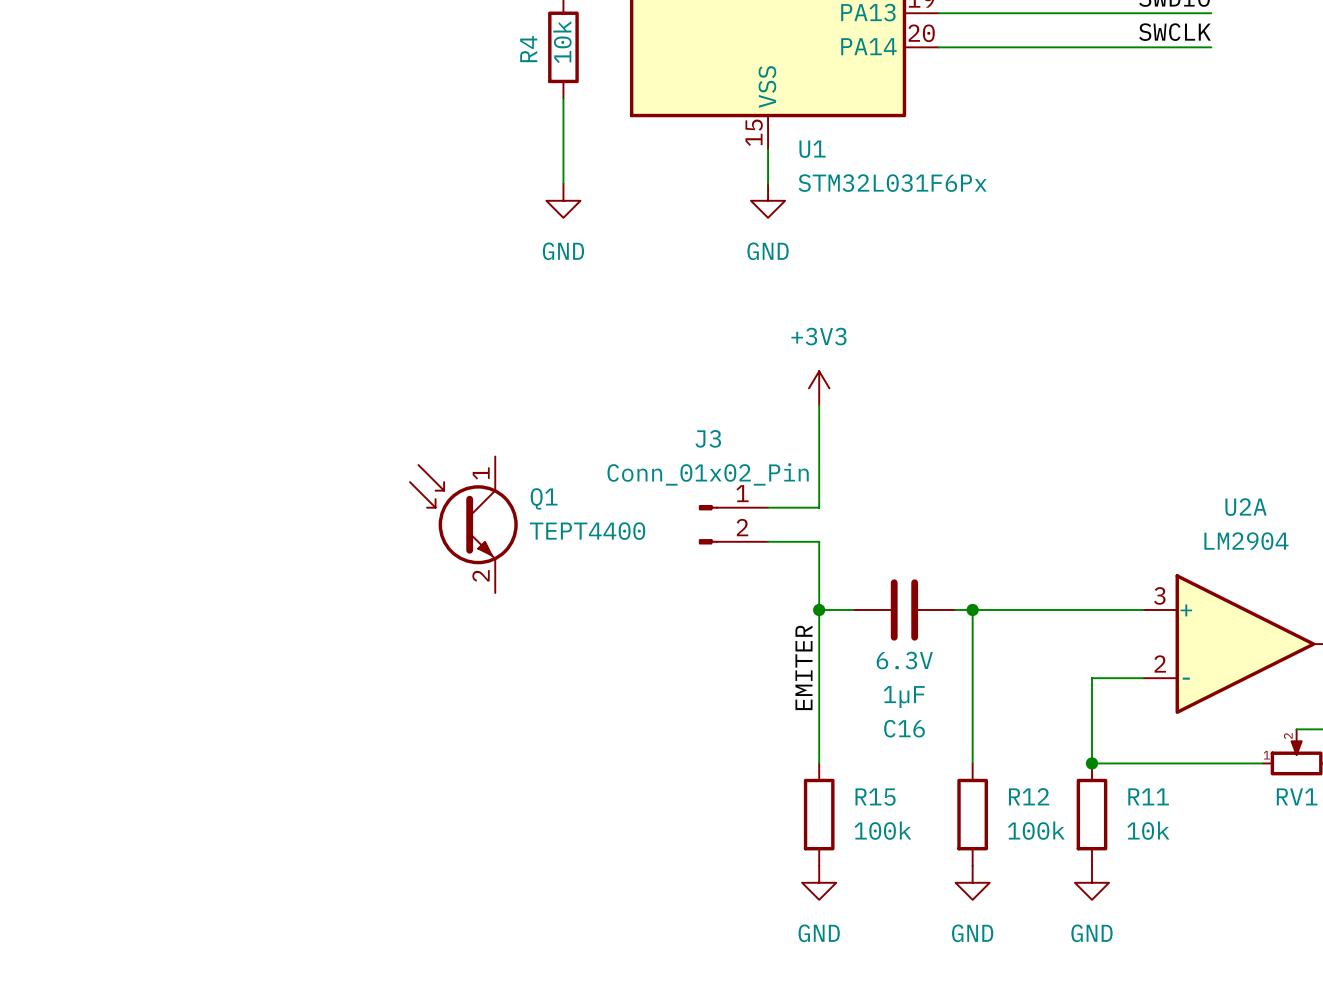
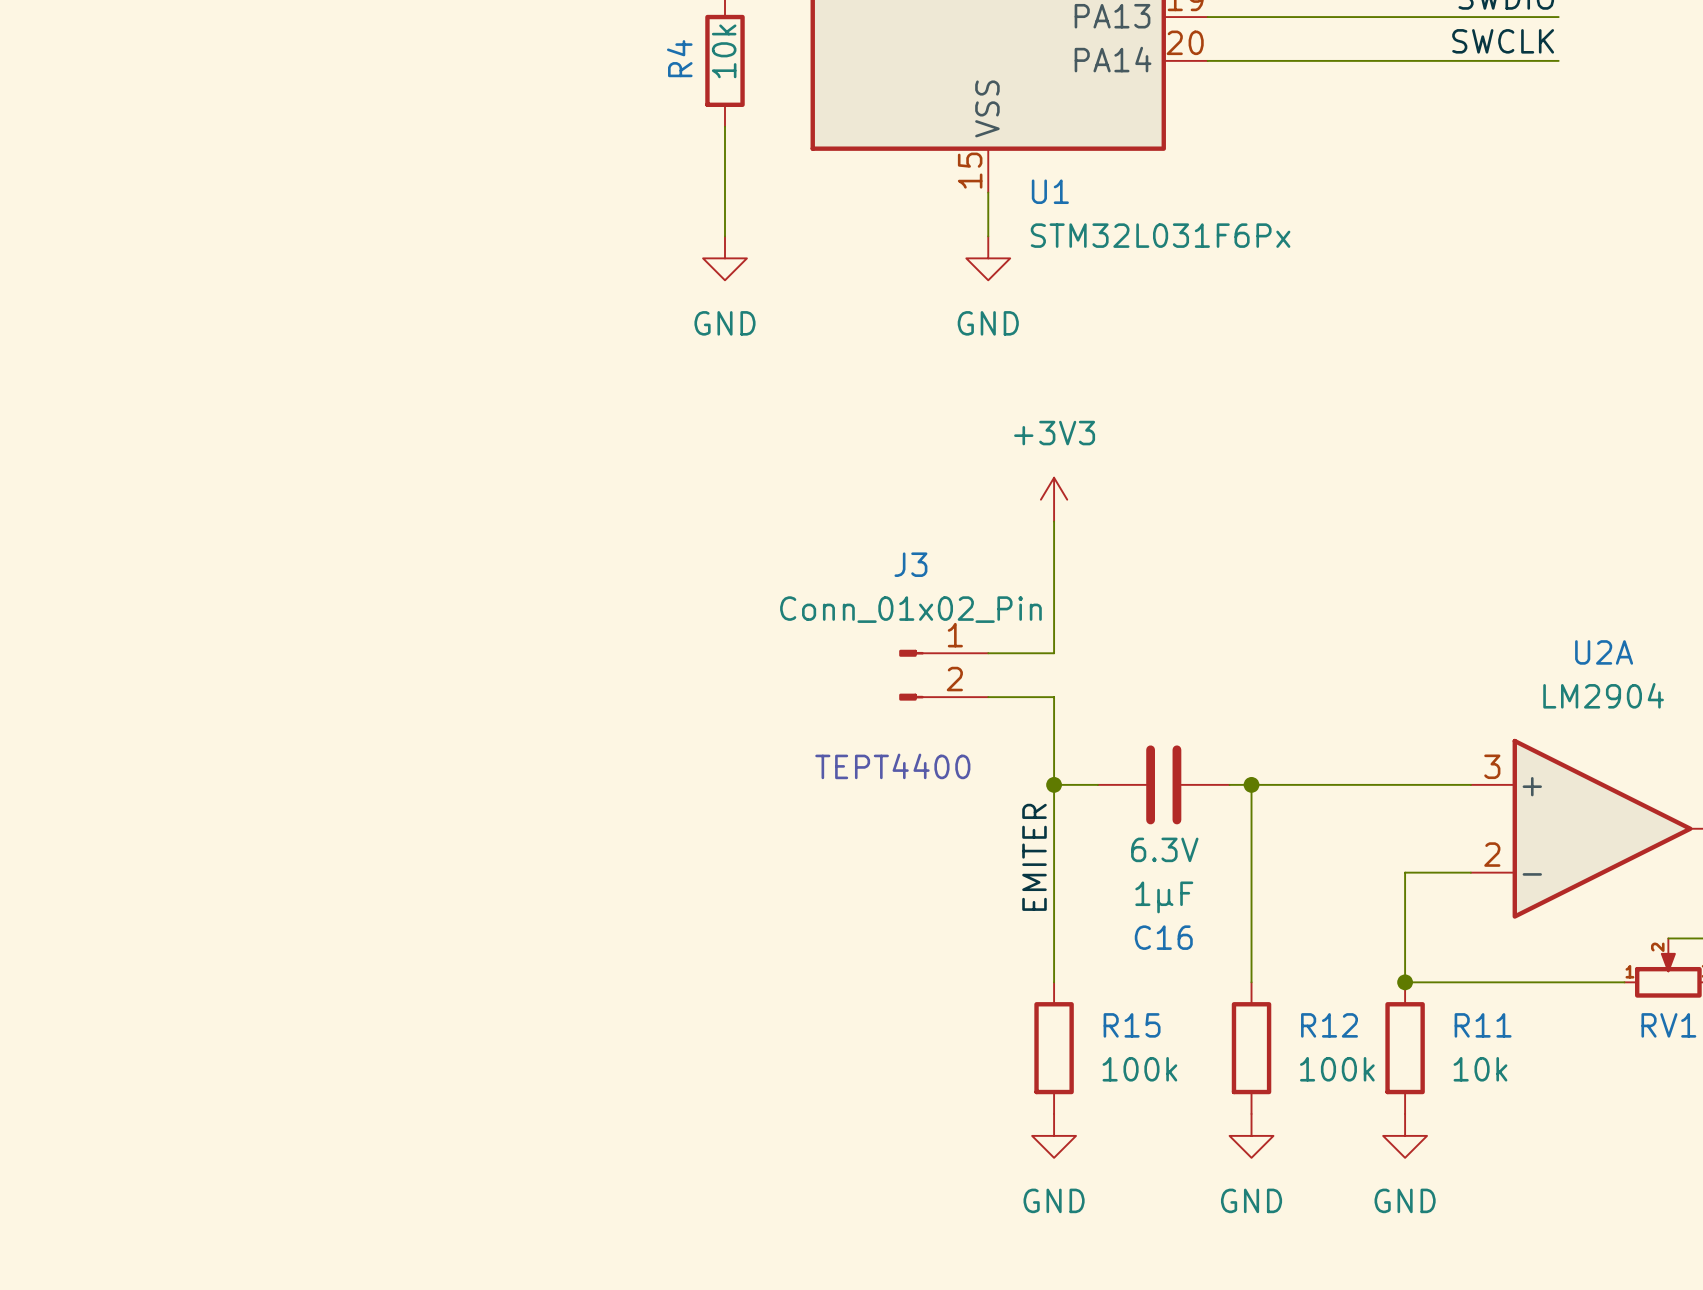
Q1: TEPT4400 (463, 524) -> none
text: none -> TEPT4400 (892, 766)

